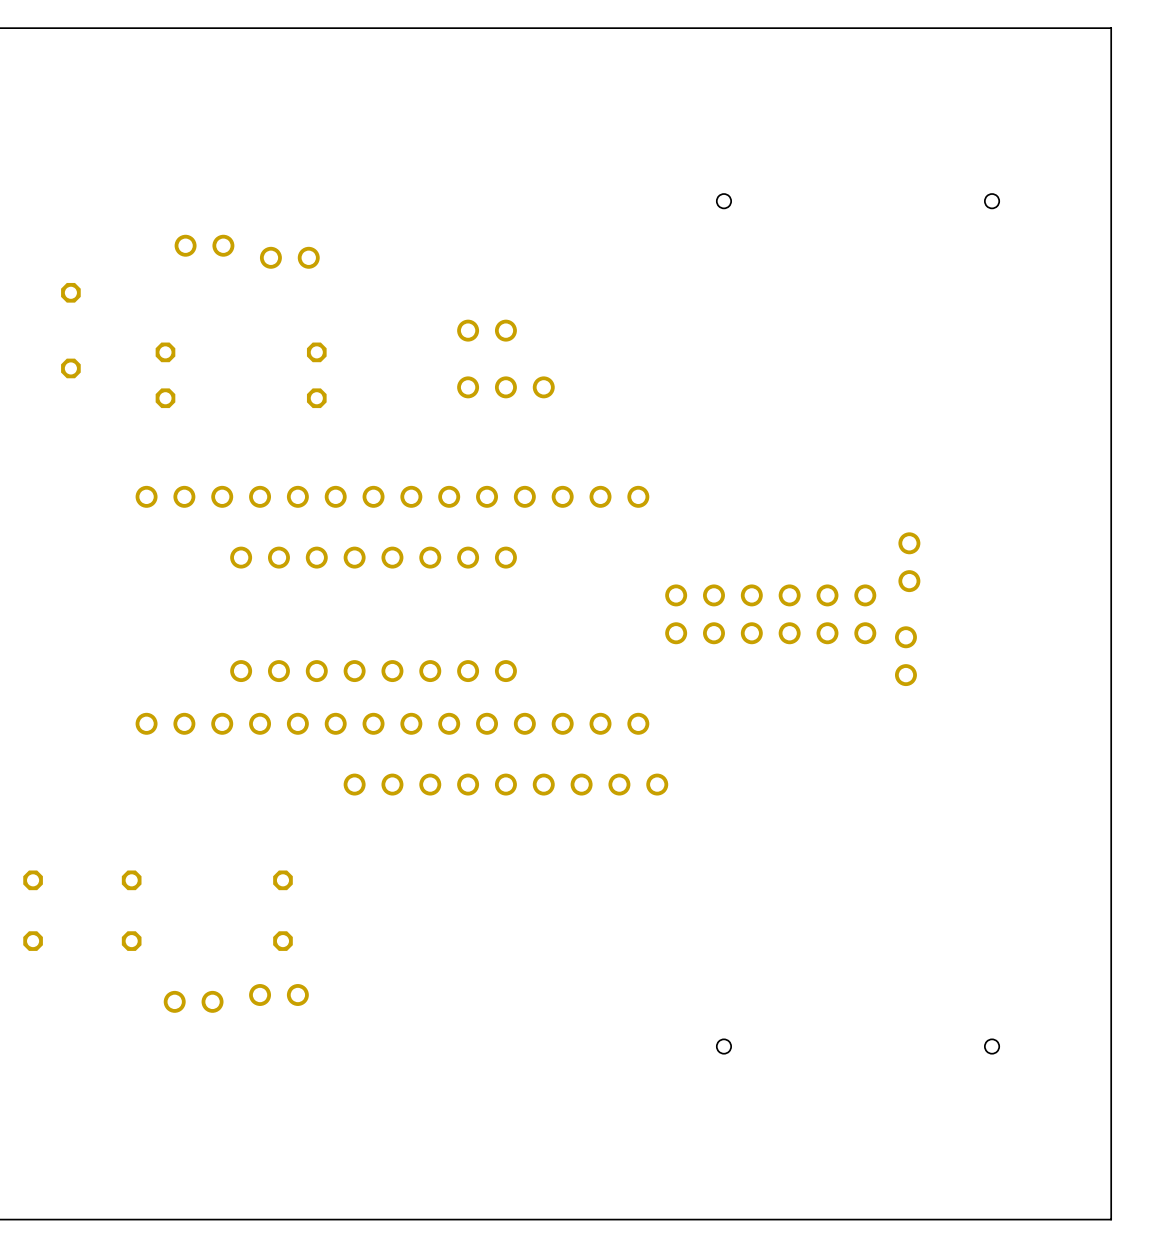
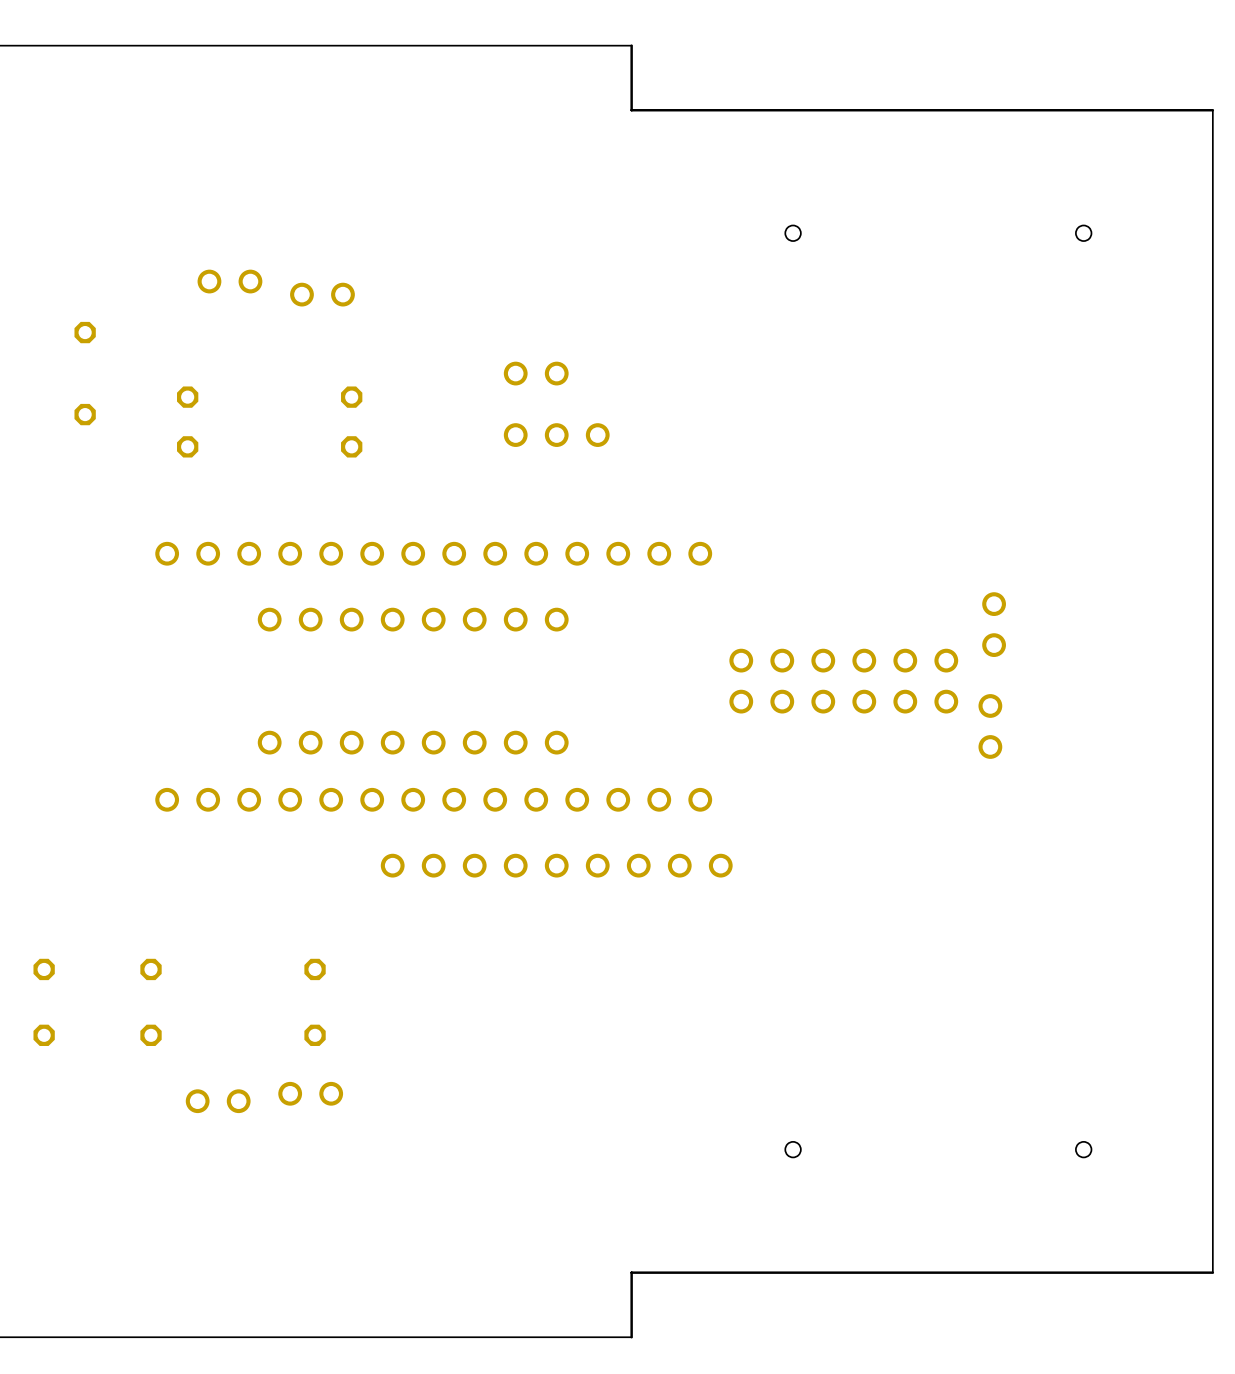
board edge: (575, 28) (1111, 28) (1111, 87) -> (631, 45) (631, 110) (1212, 110)
board edge: (1111, 1160) (1111, 1219) (575, 1219) -> (1212, 1272) (631, 1272) (631, 1337)

